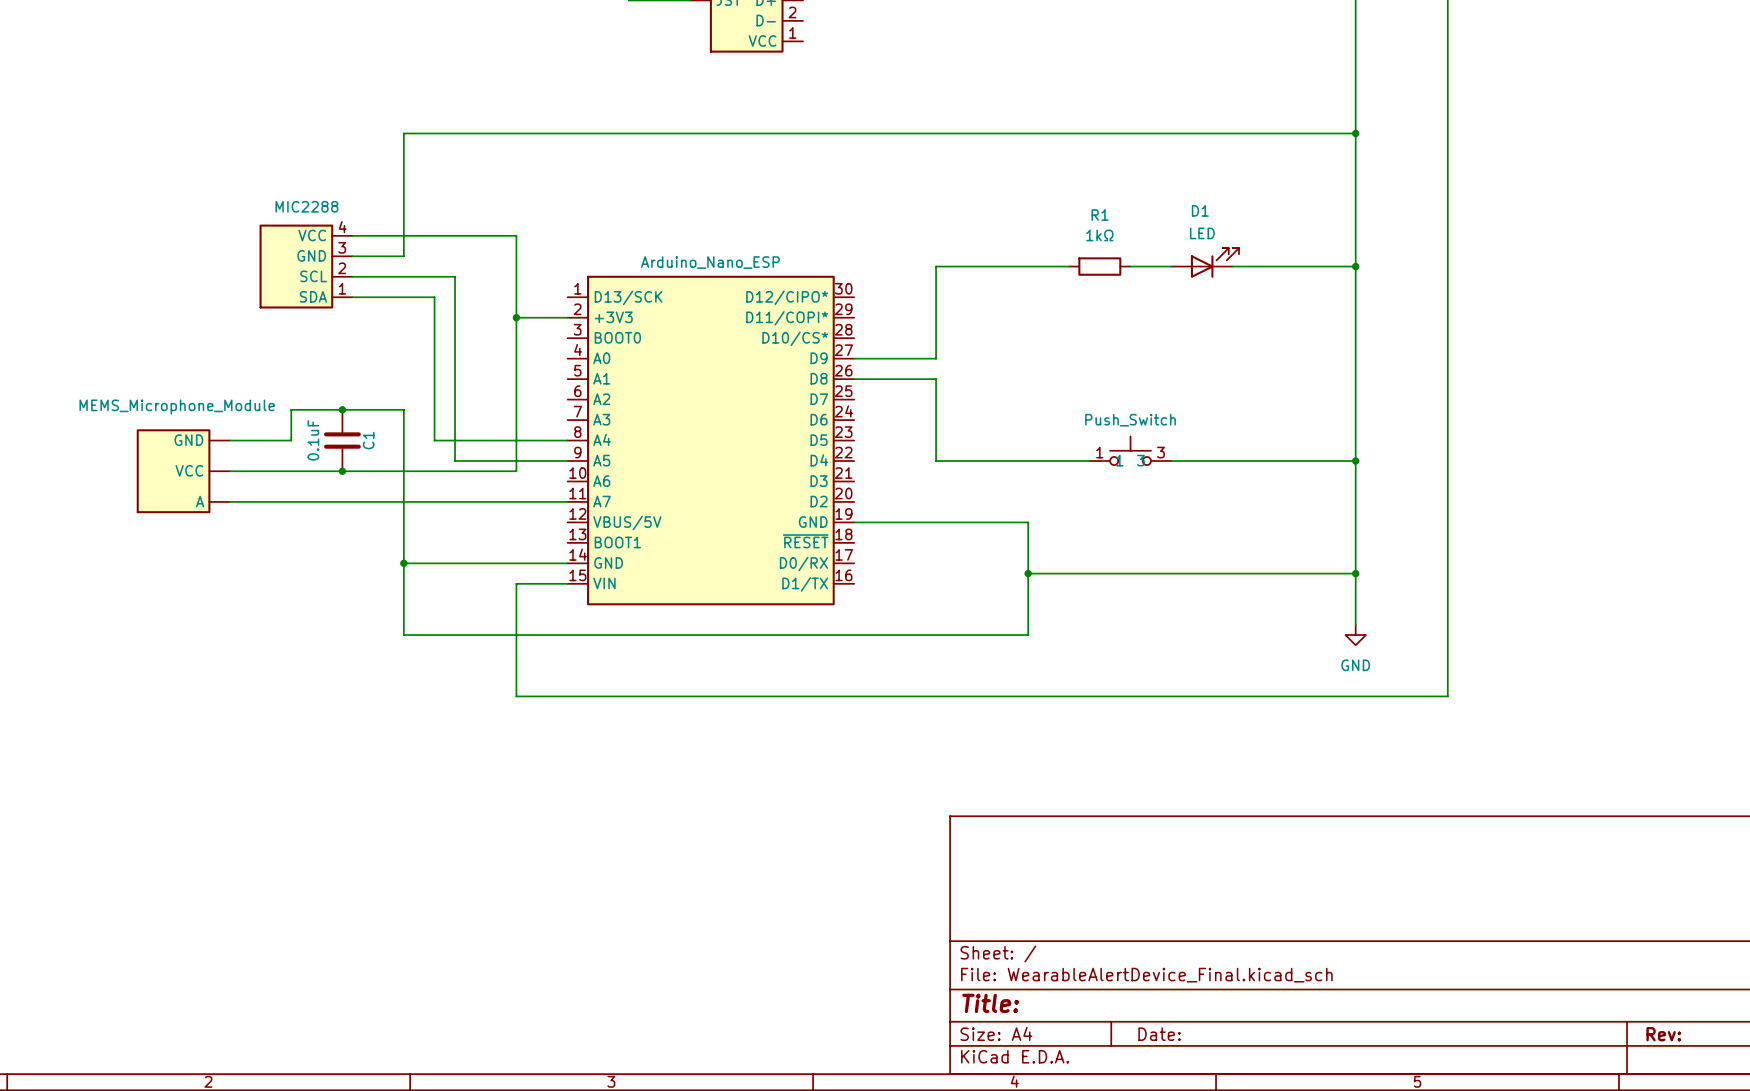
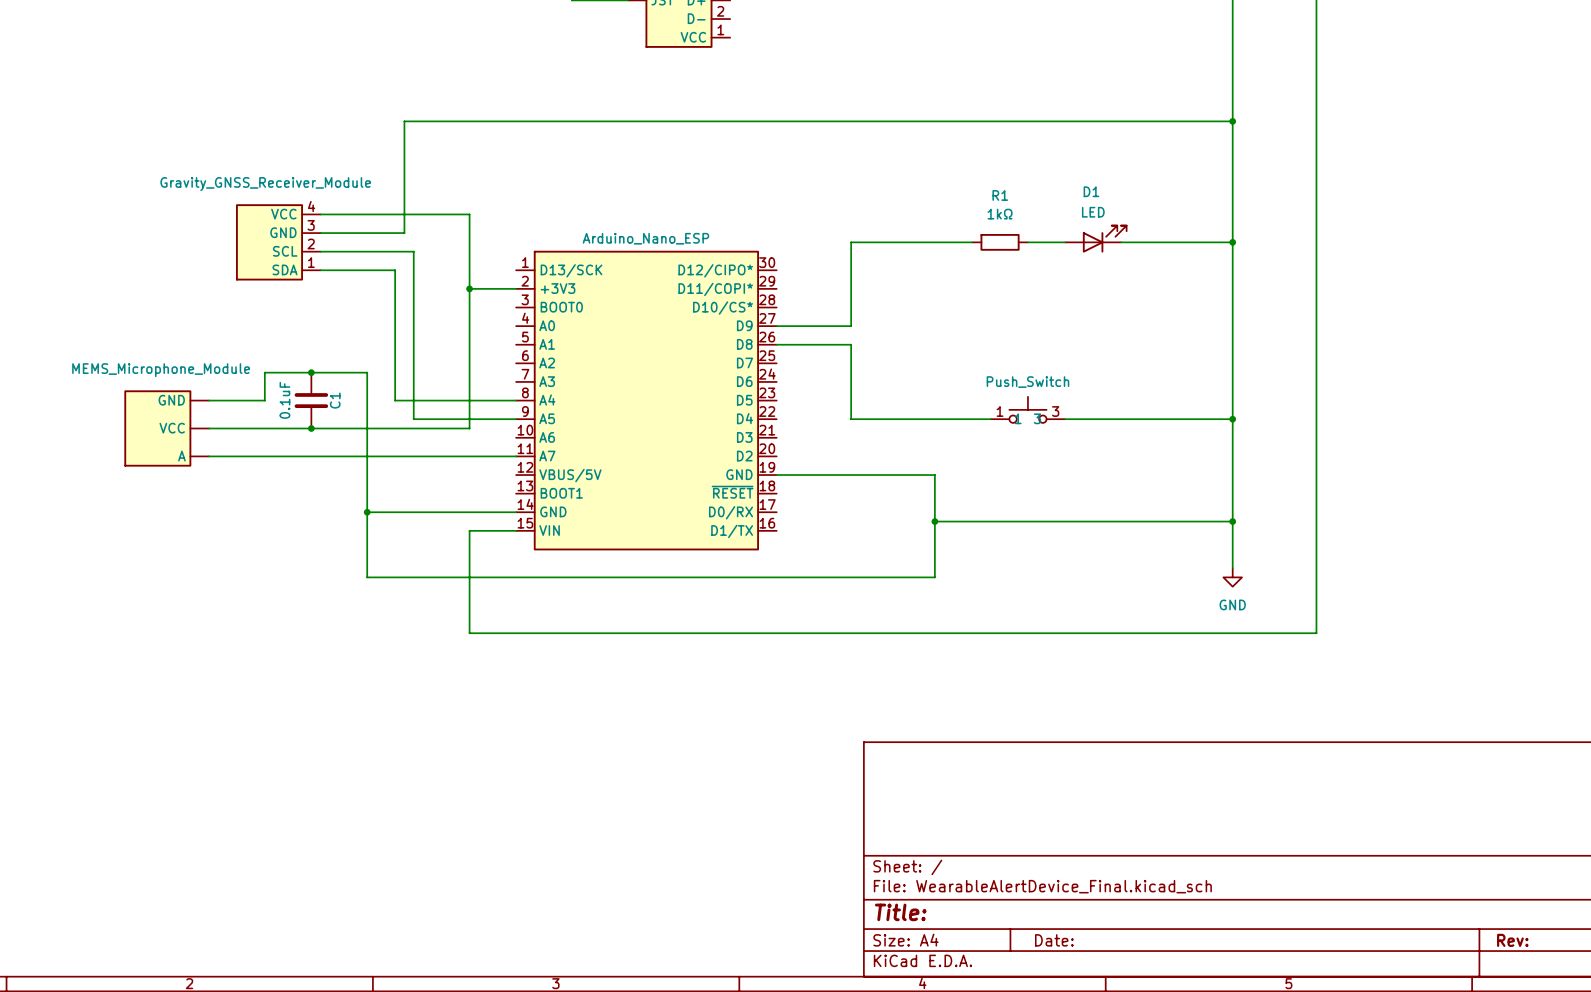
wire: (444, 133) (403, 133) (403, 256) -> (404, 121) (404, 233) (367, 233)
MIC2288 name: MIC2288 (306, 206) -> Gravity_GNSS_Receiver_Module (265, 184)

